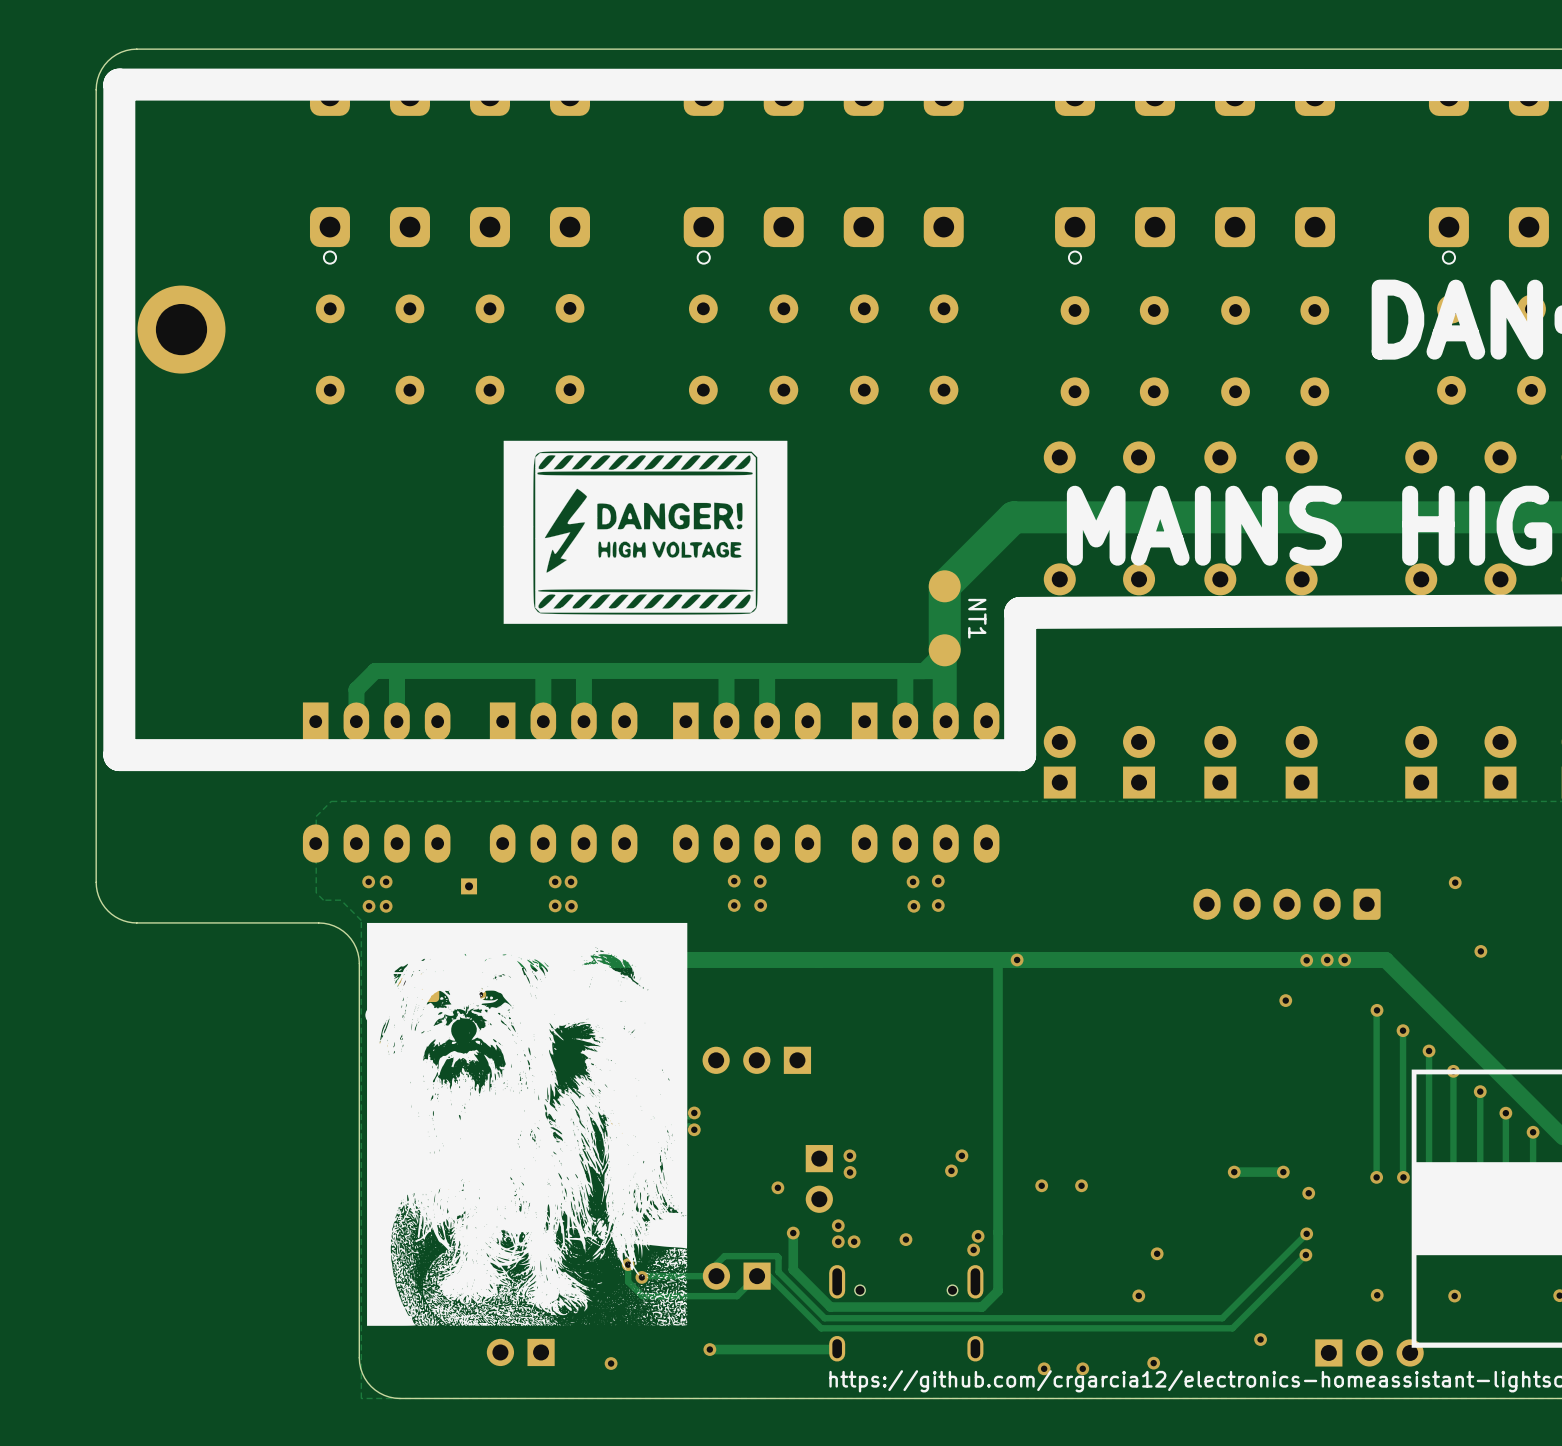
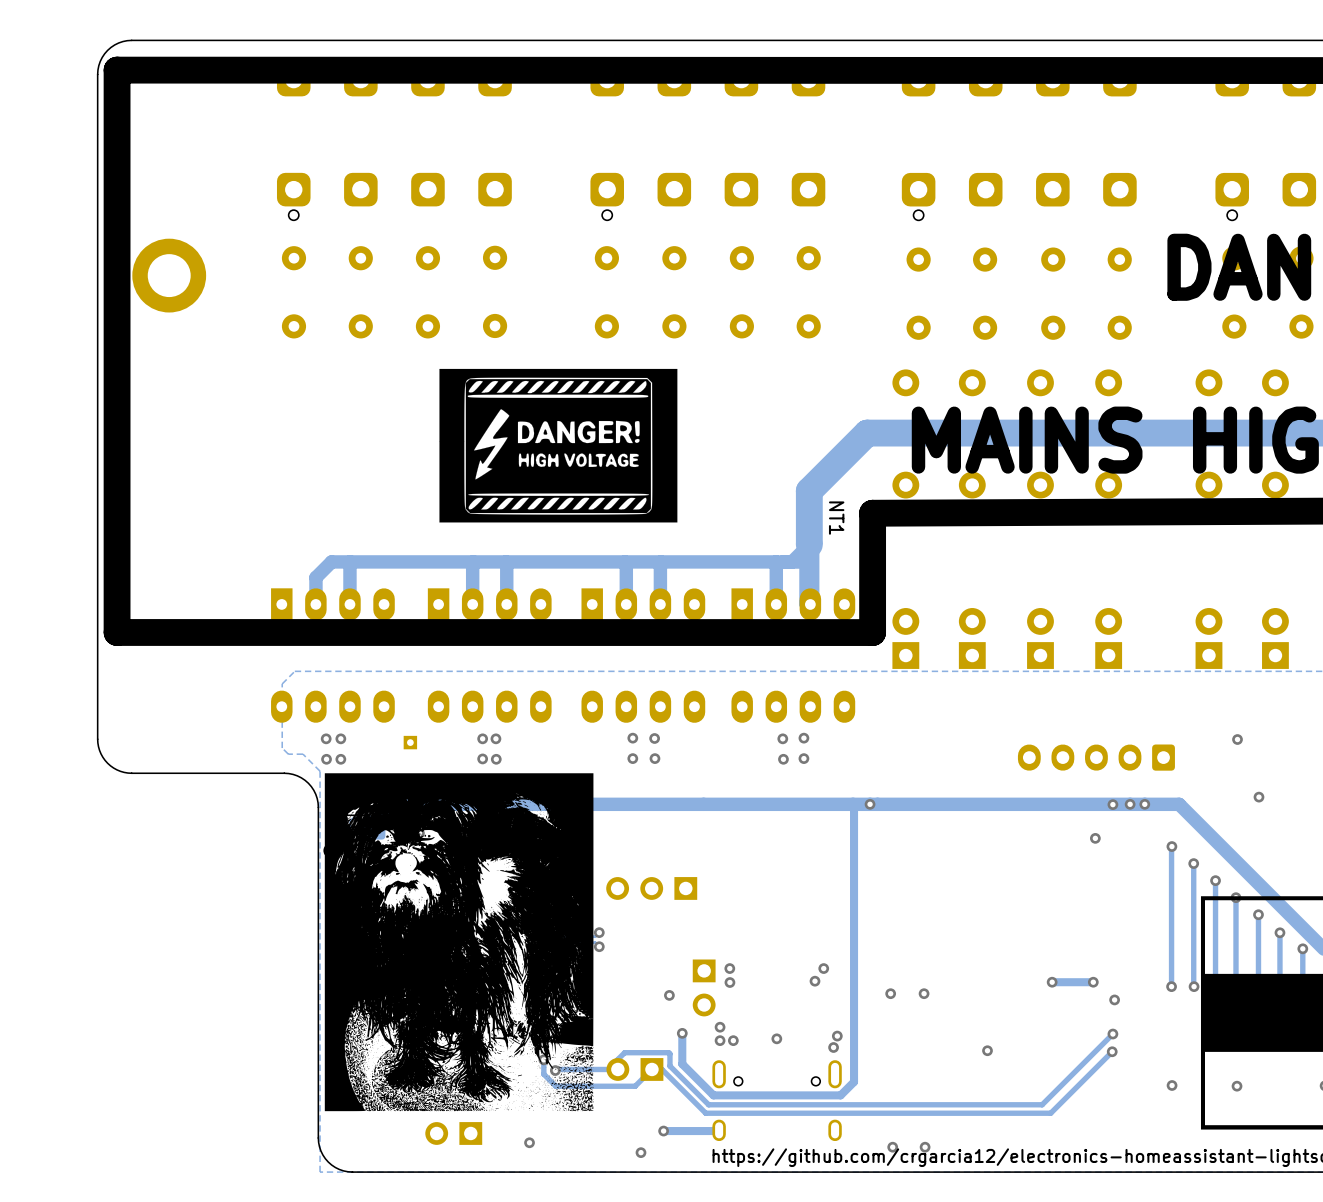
via: (1138, 1295) -> none
via: (1260, 1339) -> none
via: (709, 1349) -> none
track: (770, 1349) (709, 1349) -> none
via: none -> (663, 1131)
part: (1369, 1352) -> none
via: (1153, 1363) -> none
via: none -> (640, 1152)

